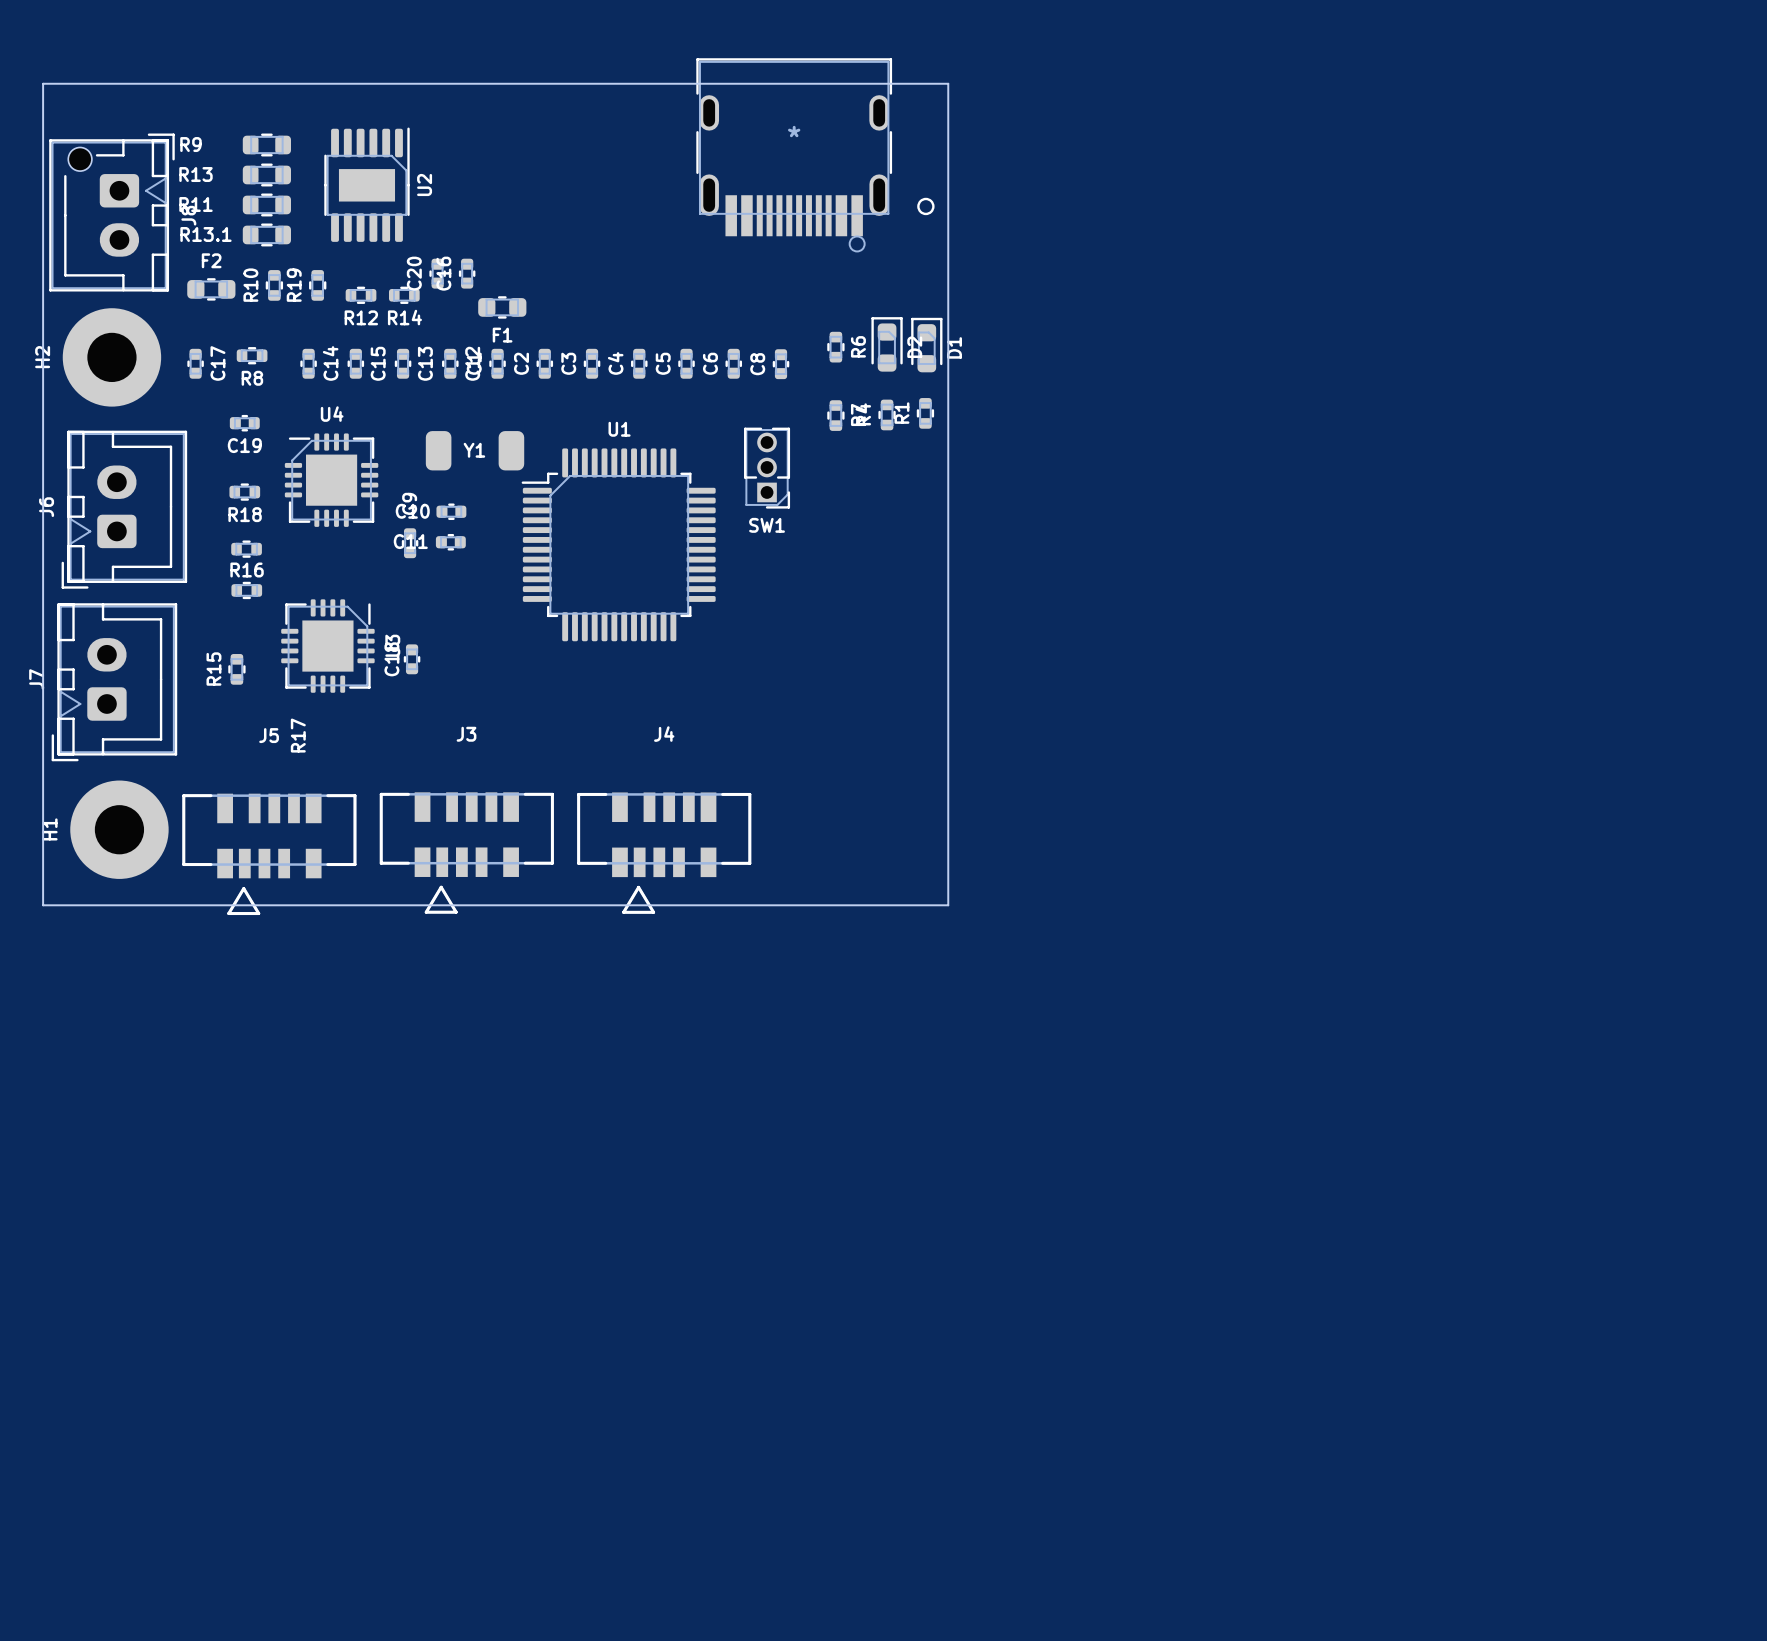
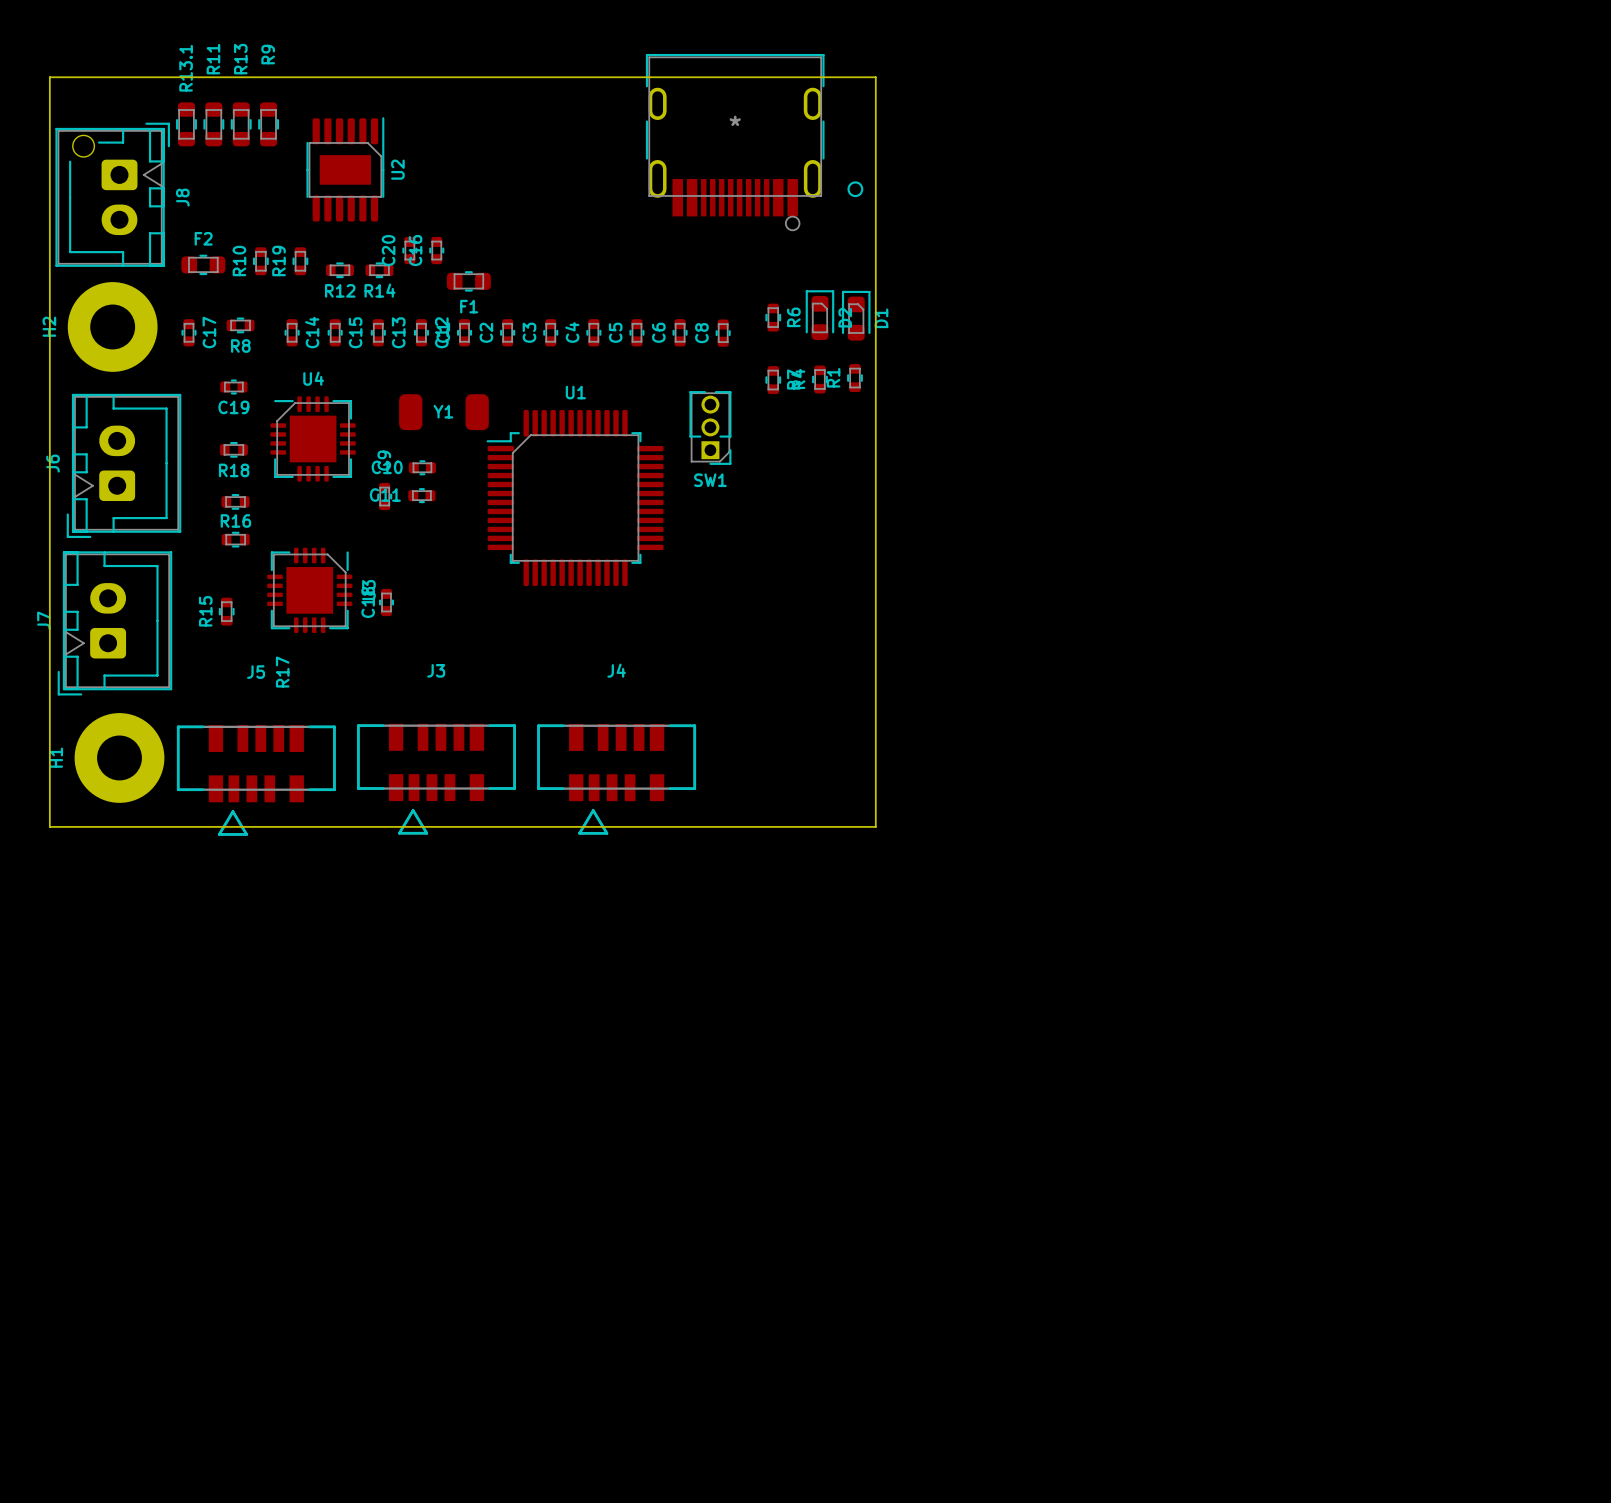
R9 rotation: 0° (266, 145) -> 90° clockwise (268, 124)
R13 rotation: 0° (266, 174) -> 90° clockwise (241, 124)
R13 position: (266, 174) -> (241, 124)
R11 rotation: 0° (266, 204) -> 90° clockwise (213, 124)
R11 position: (266, 204) -> (213, 124)
R13.1 rotation: 0° (266, 234) -> 90° clockwise (186, 124)
R13.1 position: (266, 234) -> (186, 124)

